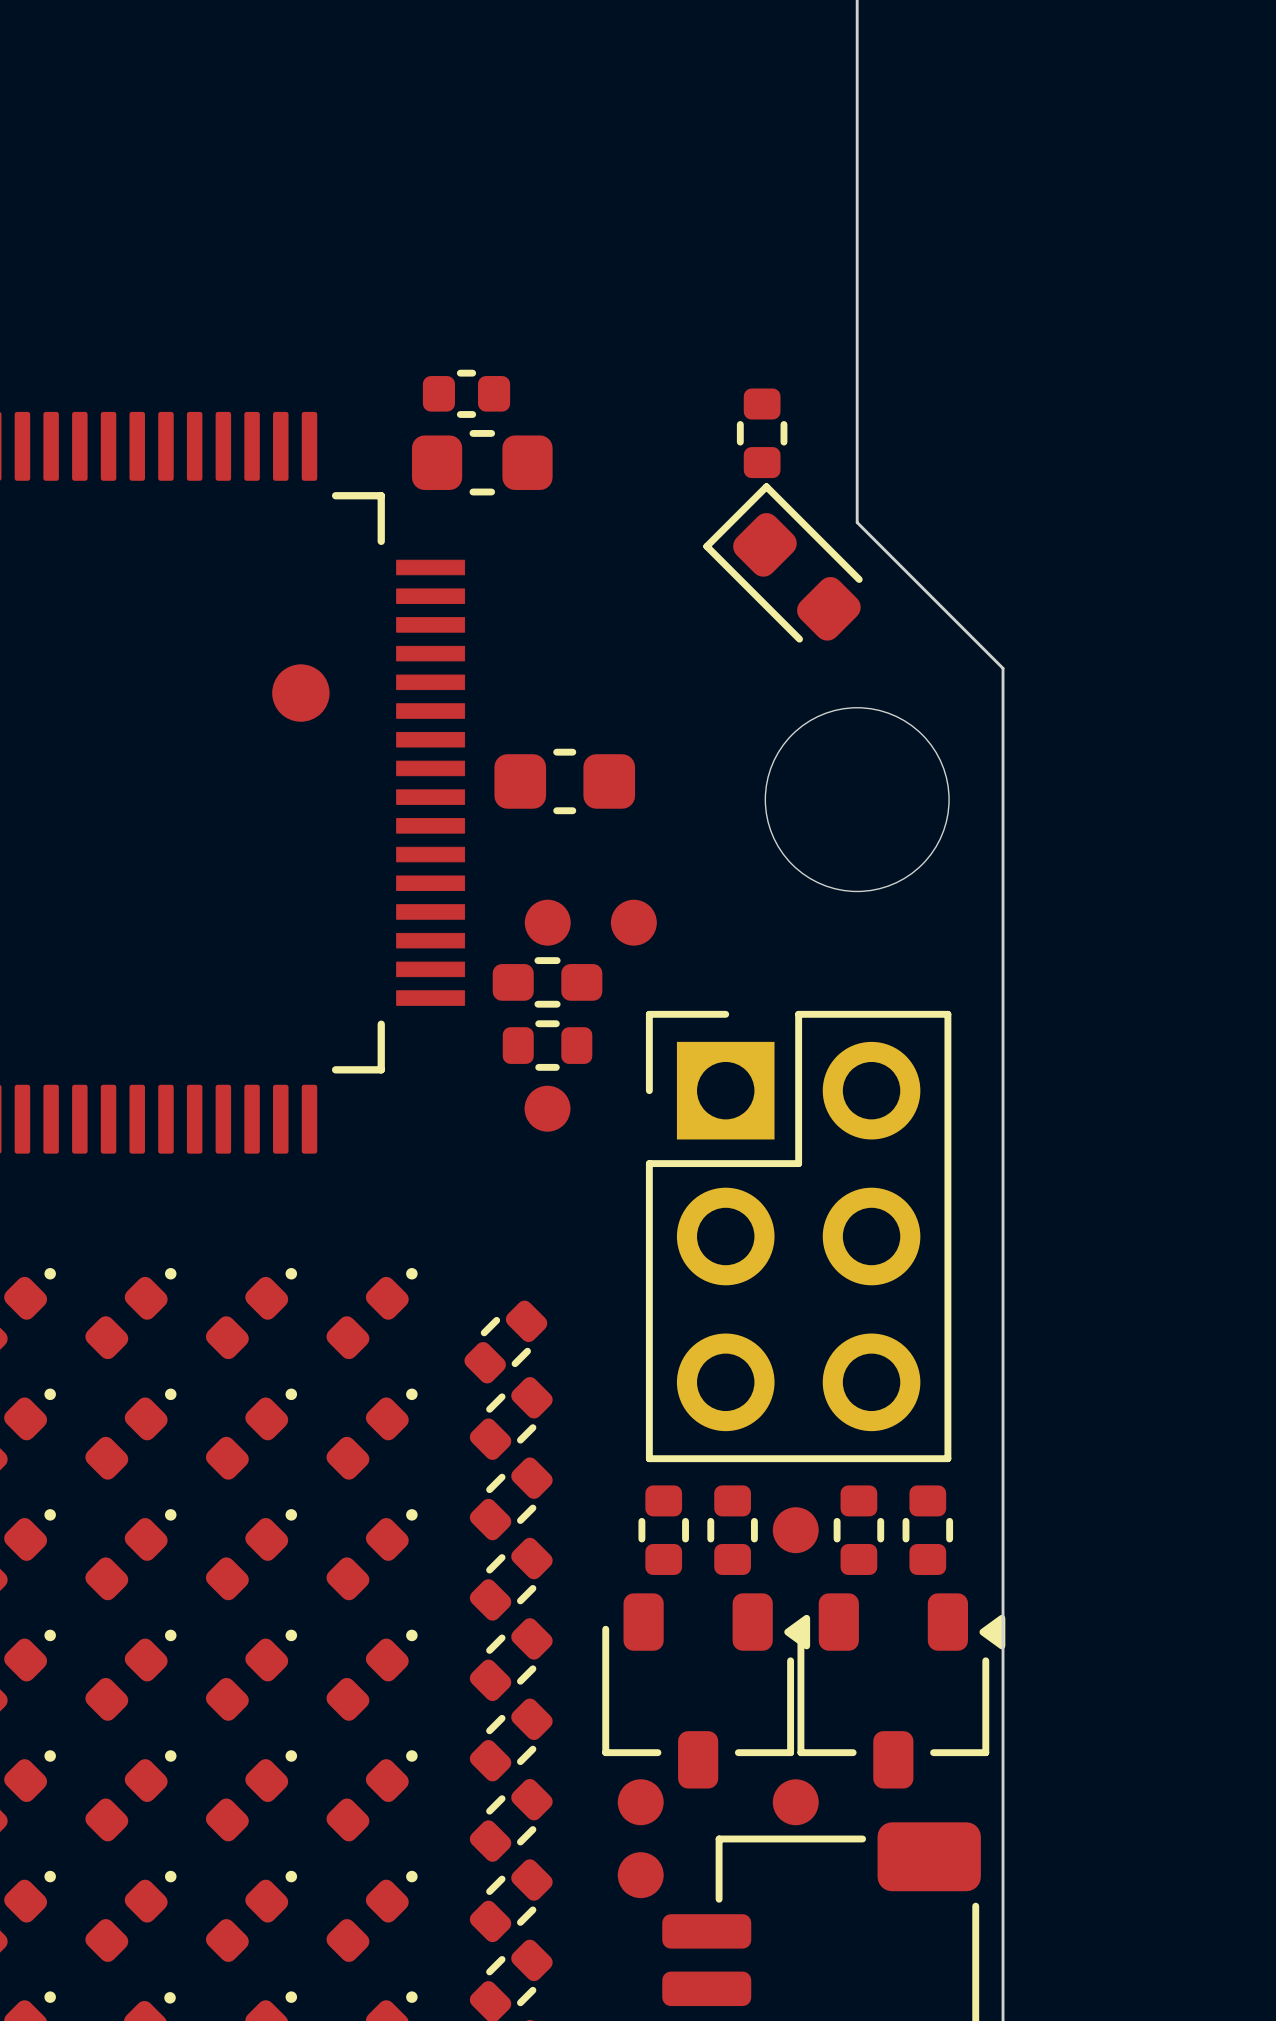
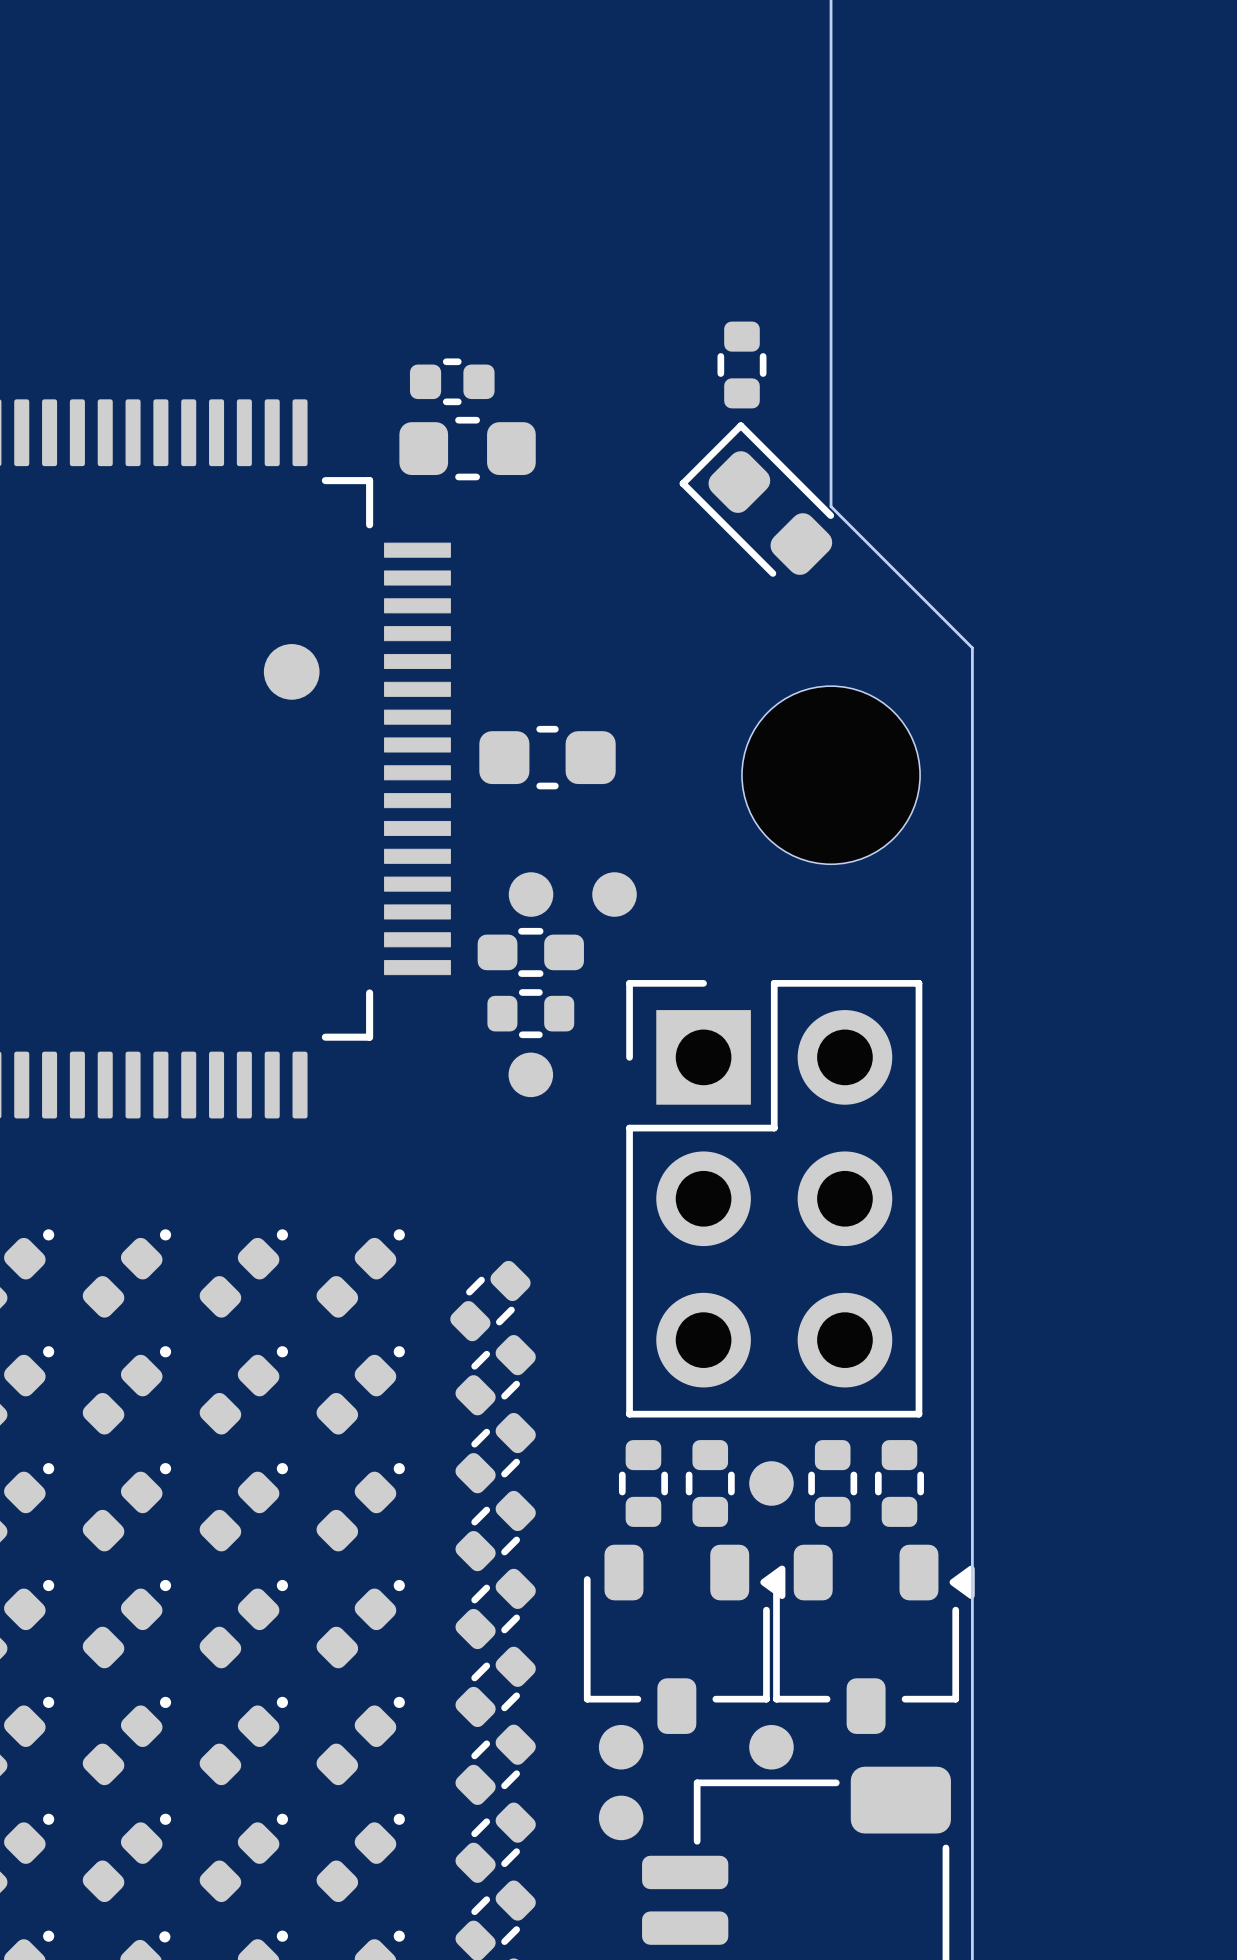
part position: (762, 433) -> (741, 364)
part position: (783, 562) -> (756, 499)

